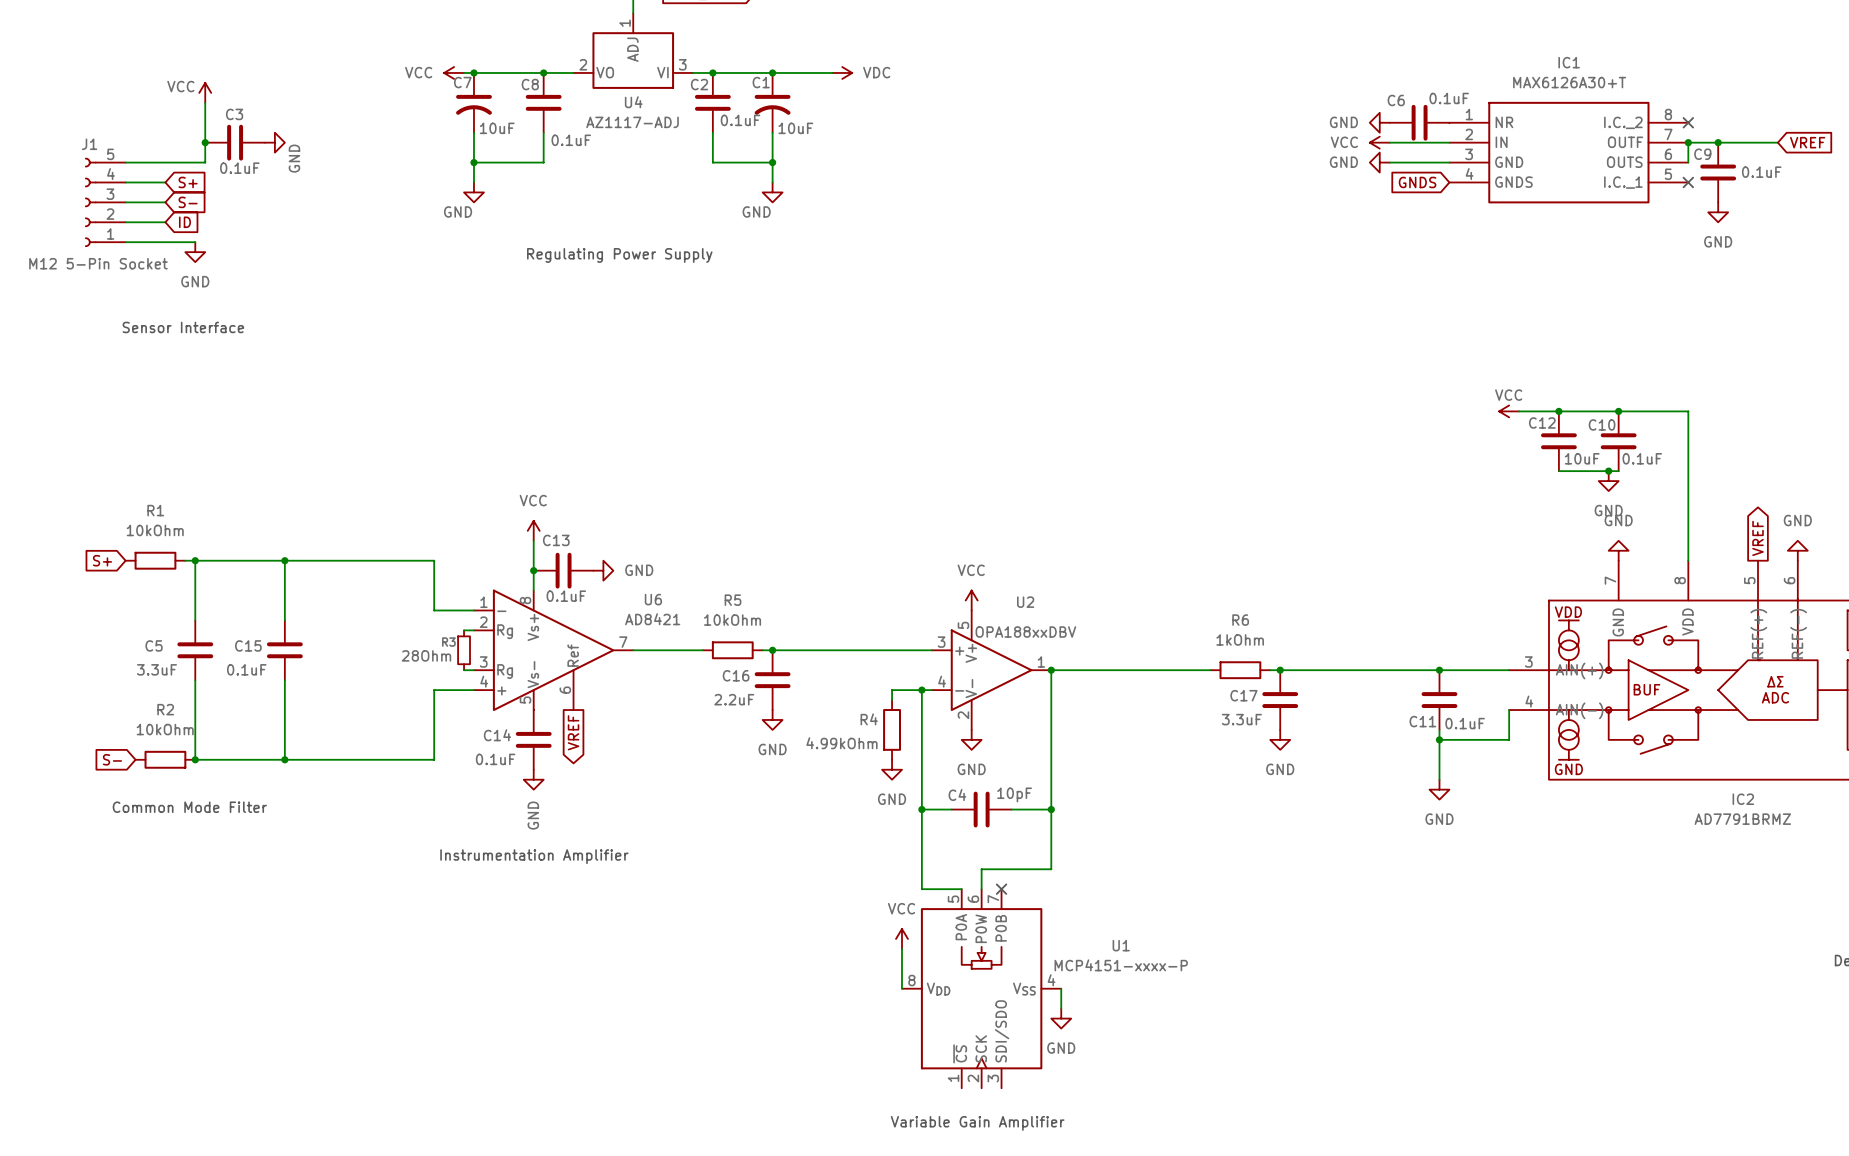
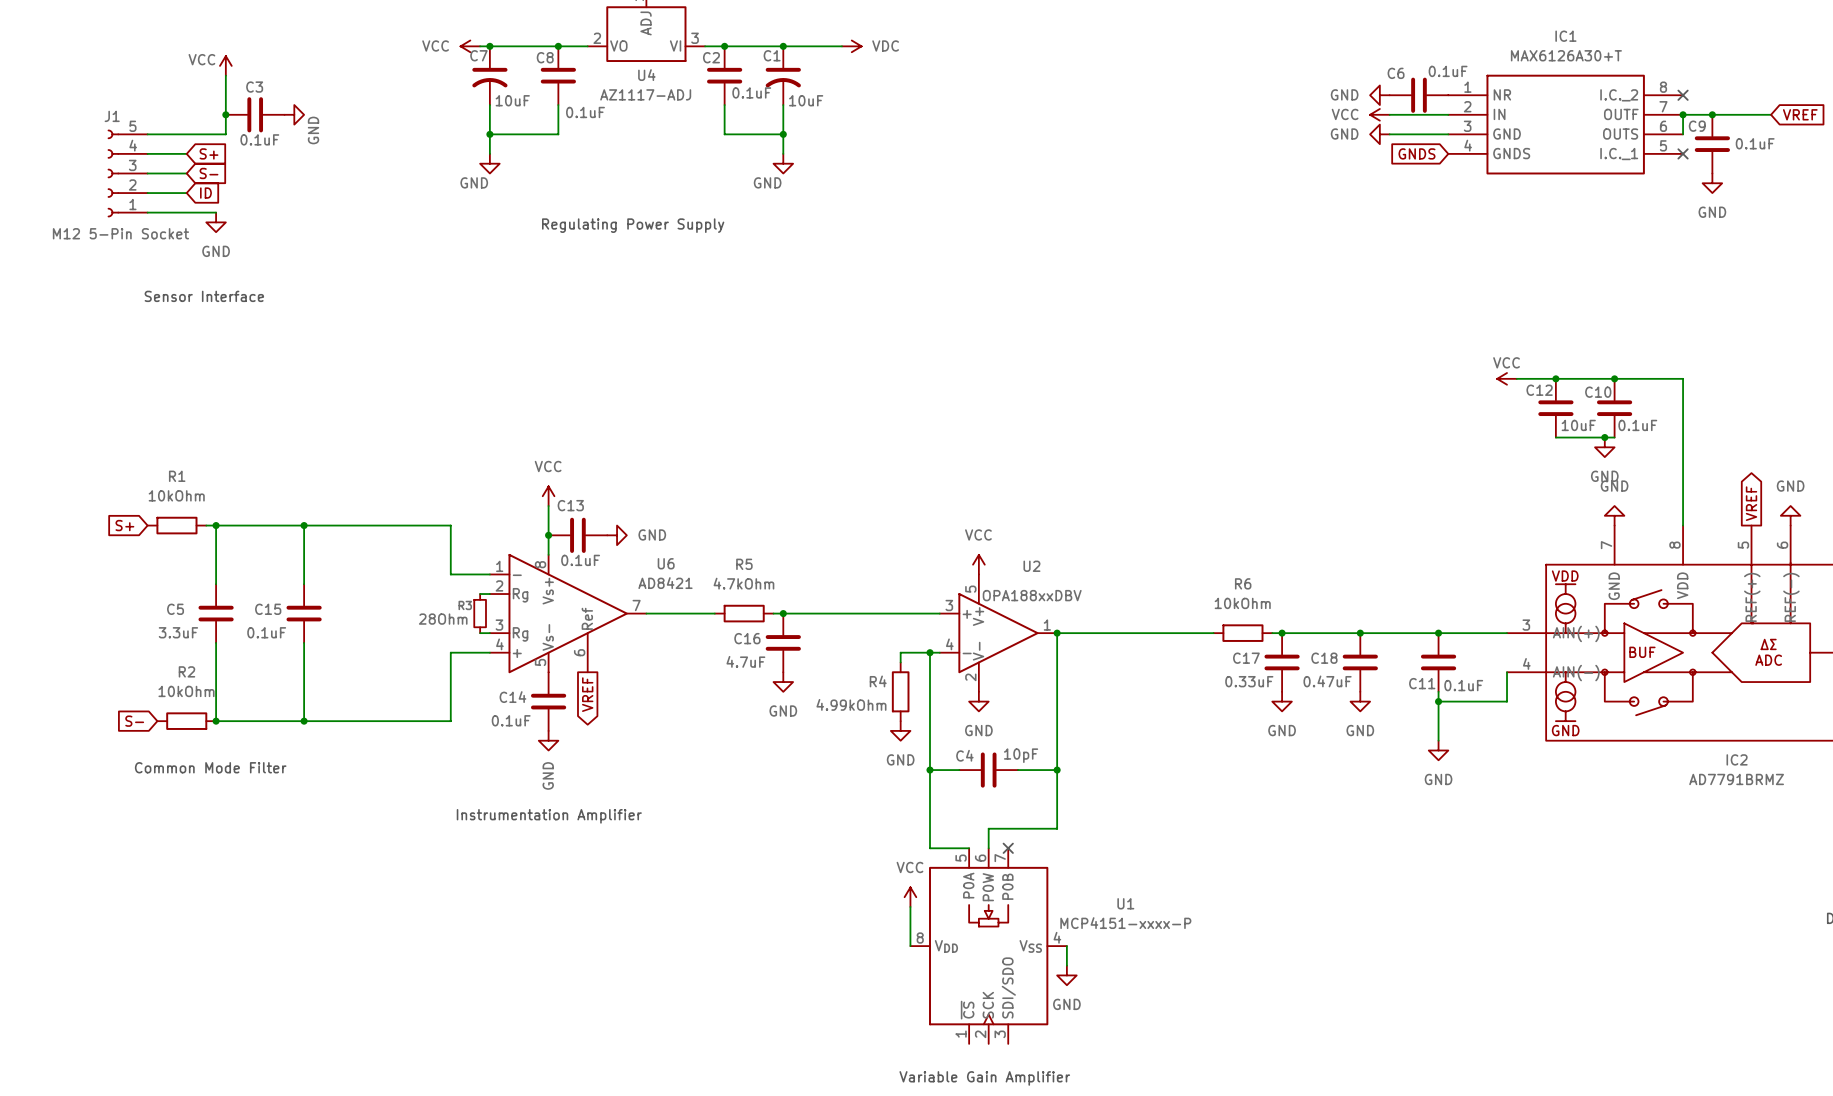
R5 value: 10kOhm (732, 620) -> 4.7kOhm (743, 583)
R6 value: 1kOhm (1240, 639) -> 10kOhm (1242, 603)
junction: none -> (1360, 633)
C16 value: 2.2uF (734, 699) -> 4.7uF (745, 661)
C18: none -> 0.47uF (1360, 662)
C17 value: 3.3uF (1241, 719) -> 0.33uF (1249, 681)
power symbol: none -> GND (1360, 701)

